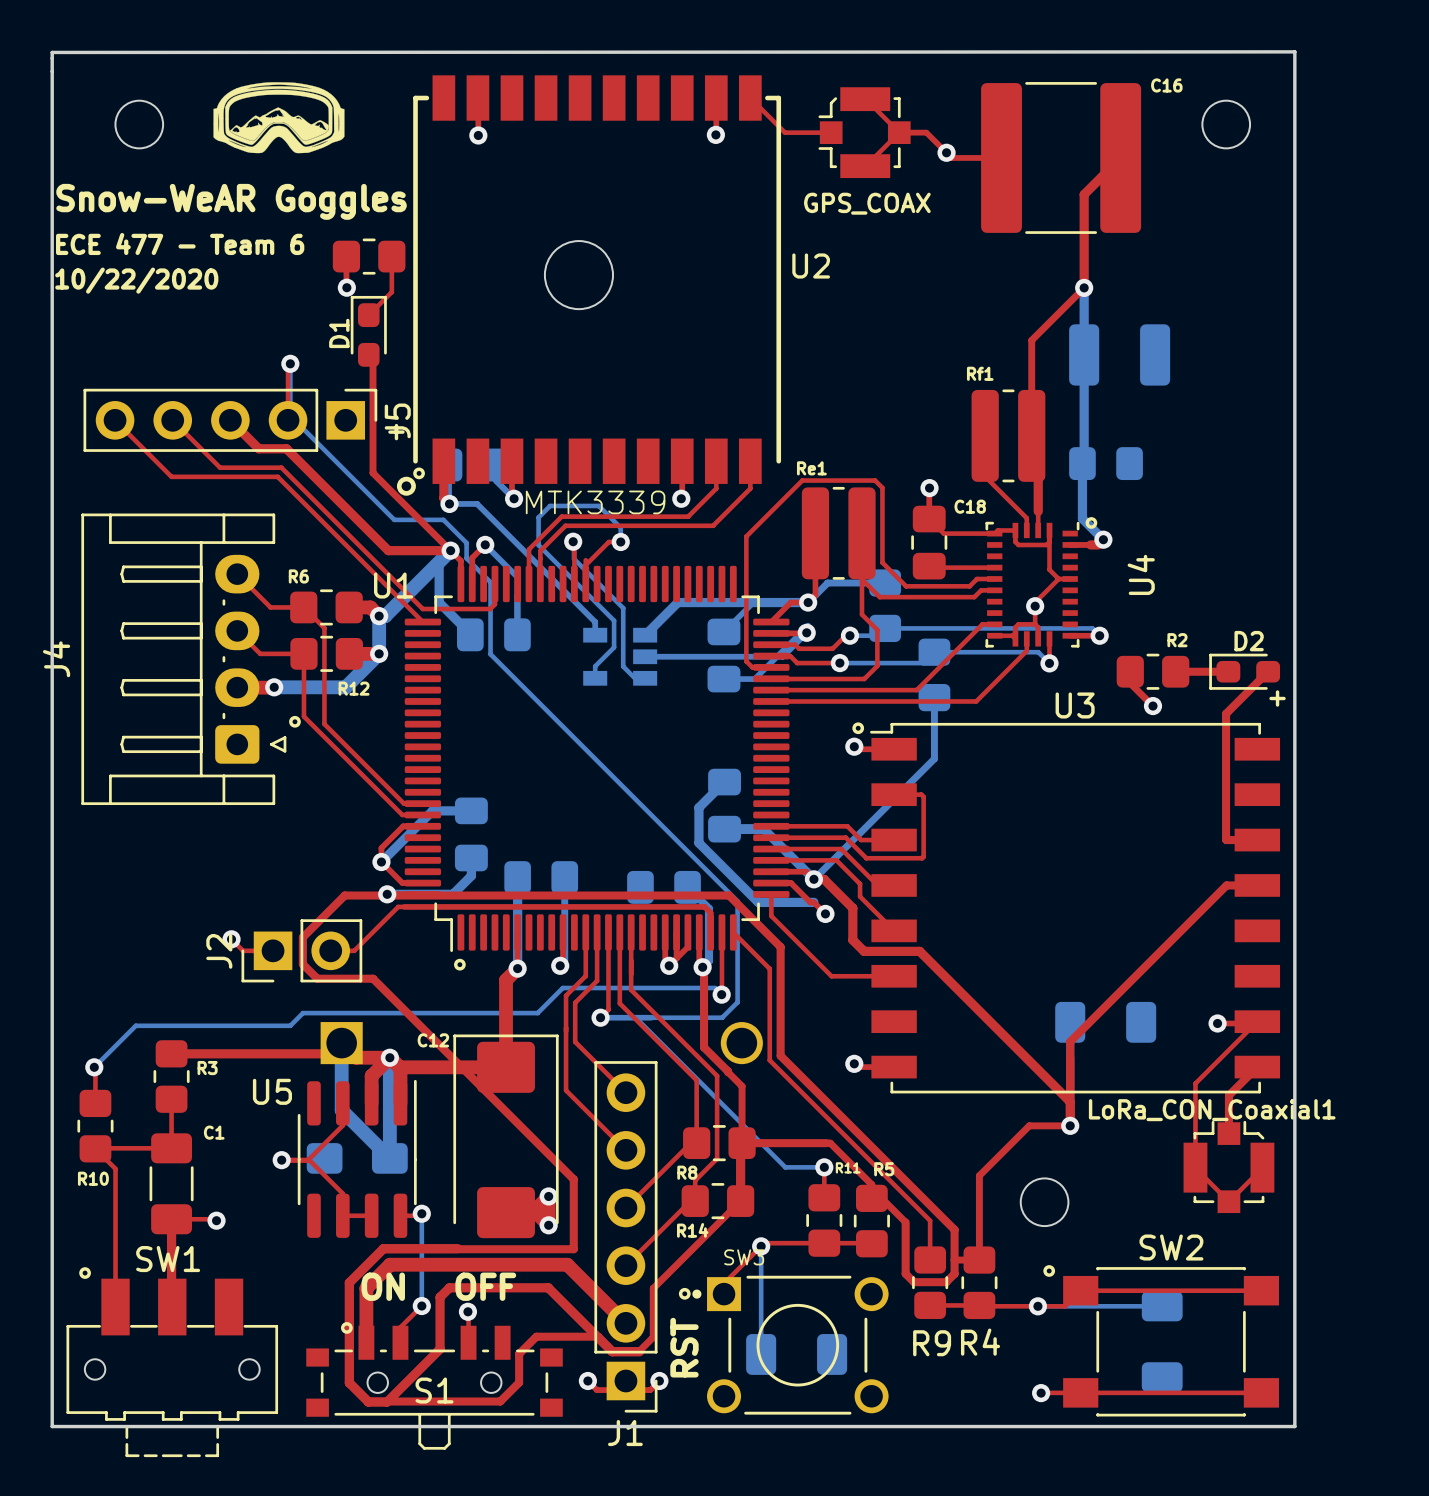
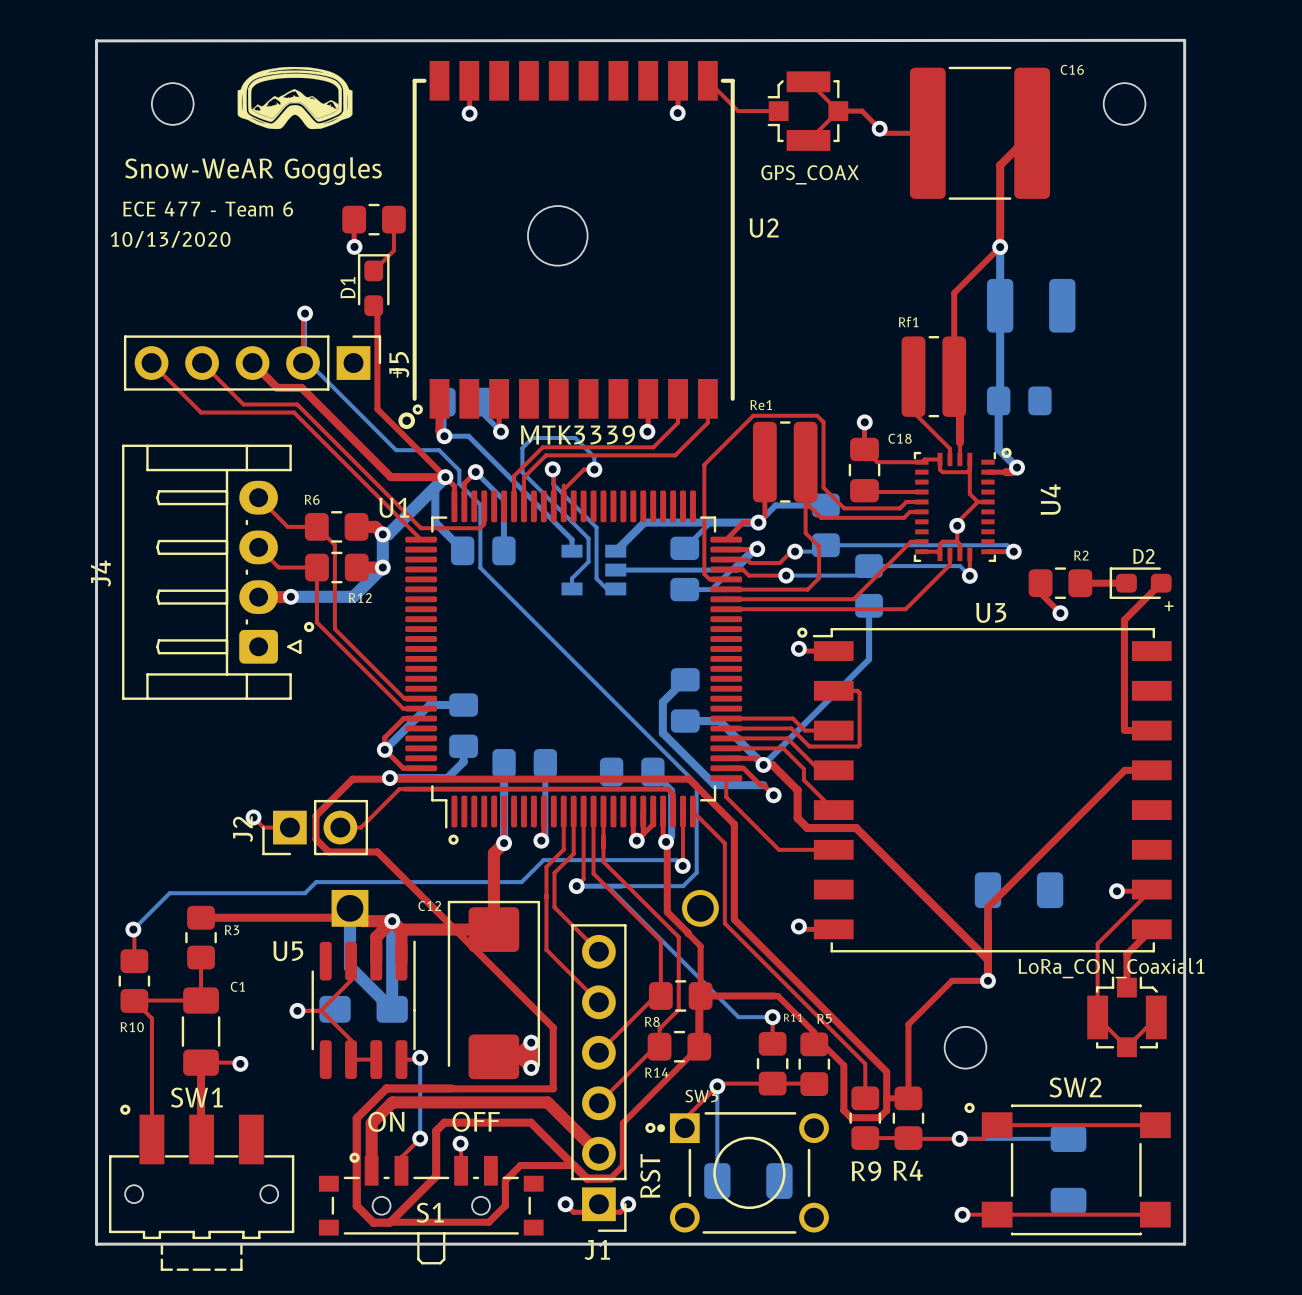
text: 10/22/2020 (136, 280) -> 10/13/2020 (170, 239)

